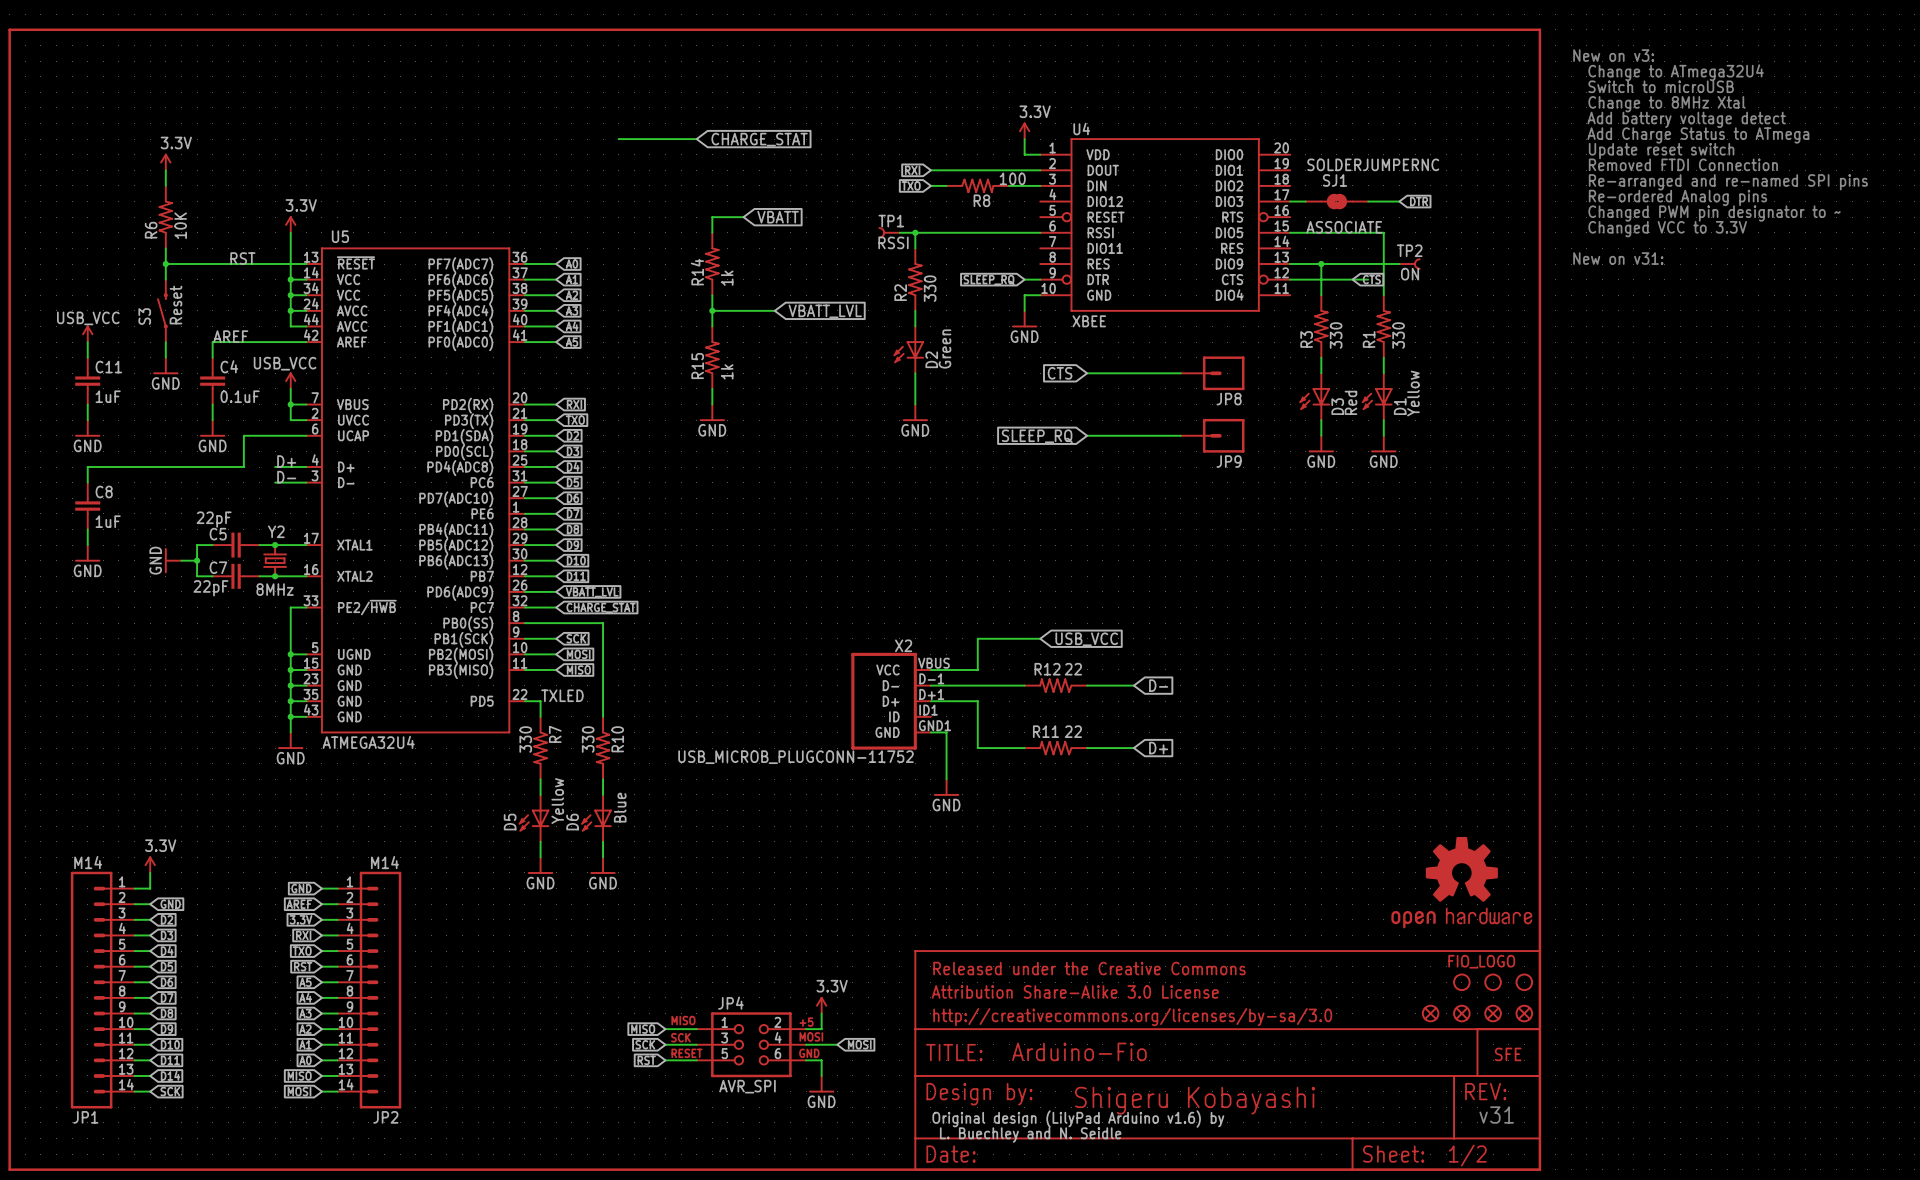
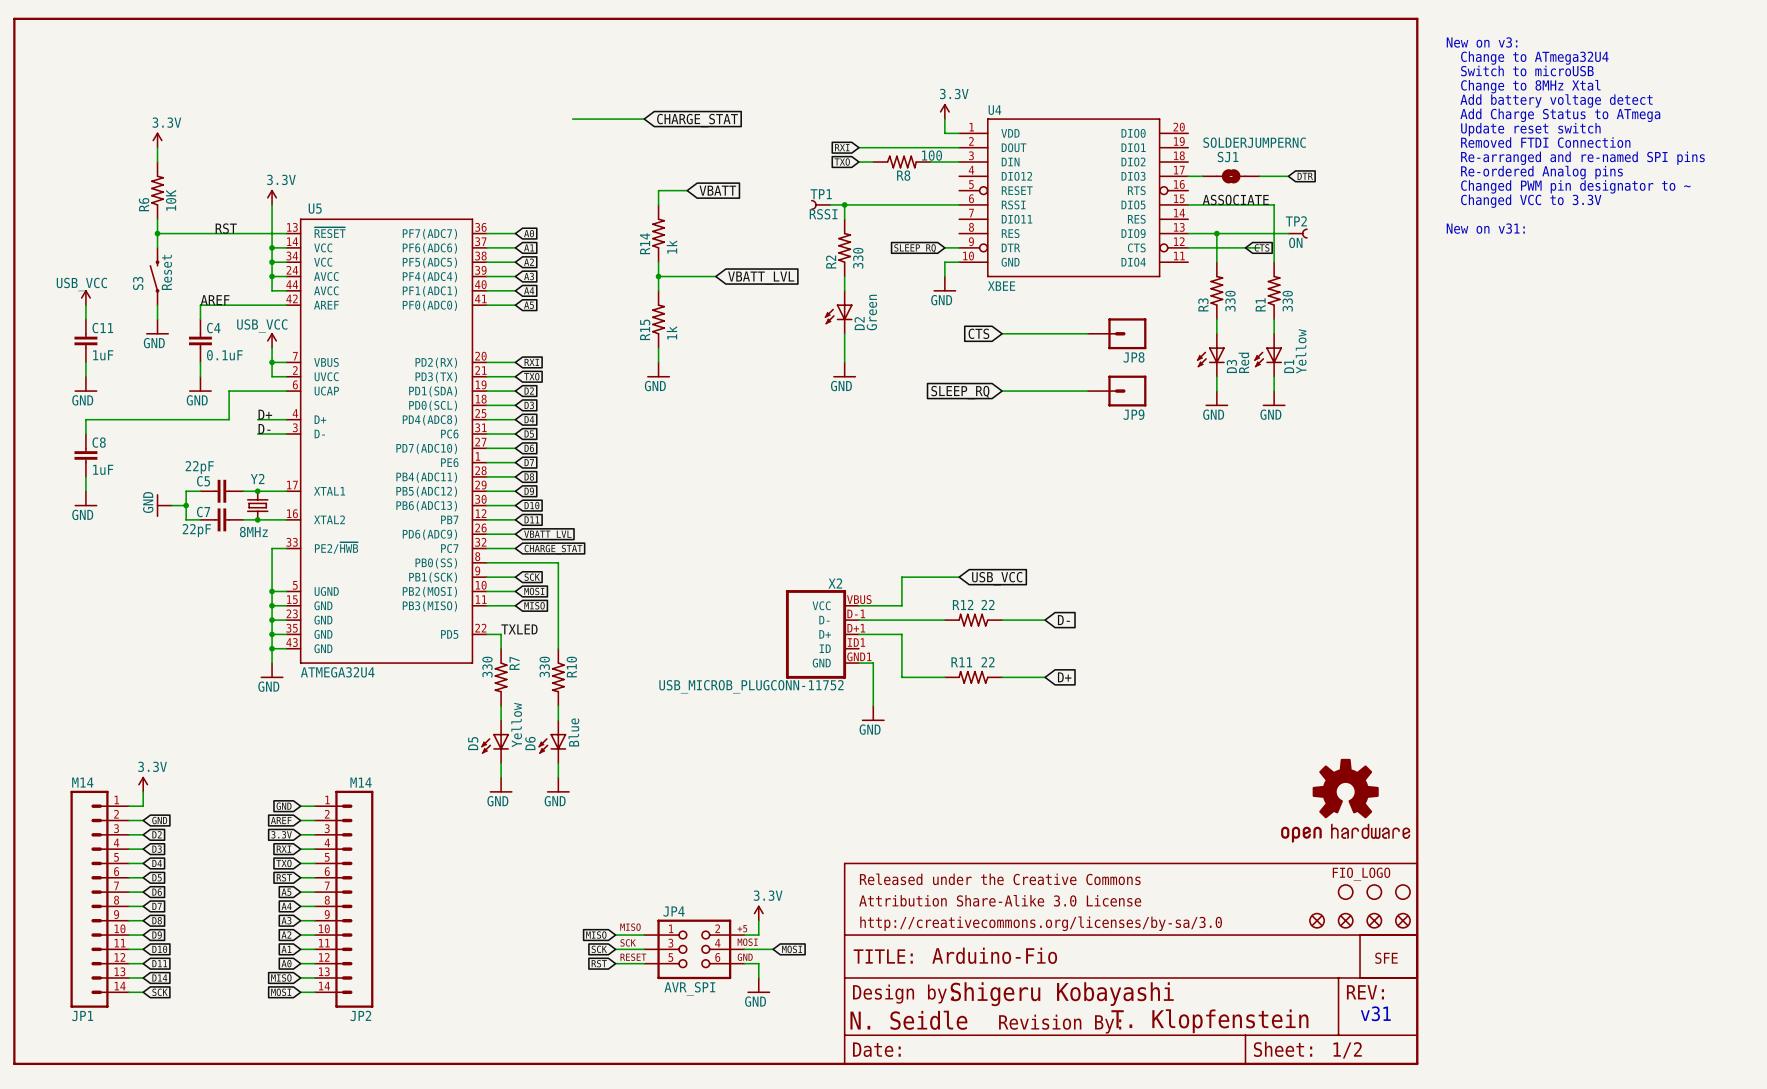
text position: Shigeru Kobayashi (1195, 1100) -> Shigeru Kobayashi (1062, 994)
text: Original design (LilyPad Arduino v1.6) by (1078, 1119) -> none
text: none -> N. Seidle (908, 1020)
text: none -> T. Klopfenstein (1209, 1021)
part: none -> (1060, 1024)
text: L. Buechley and N. Seidle (1030, 1135) -> none

